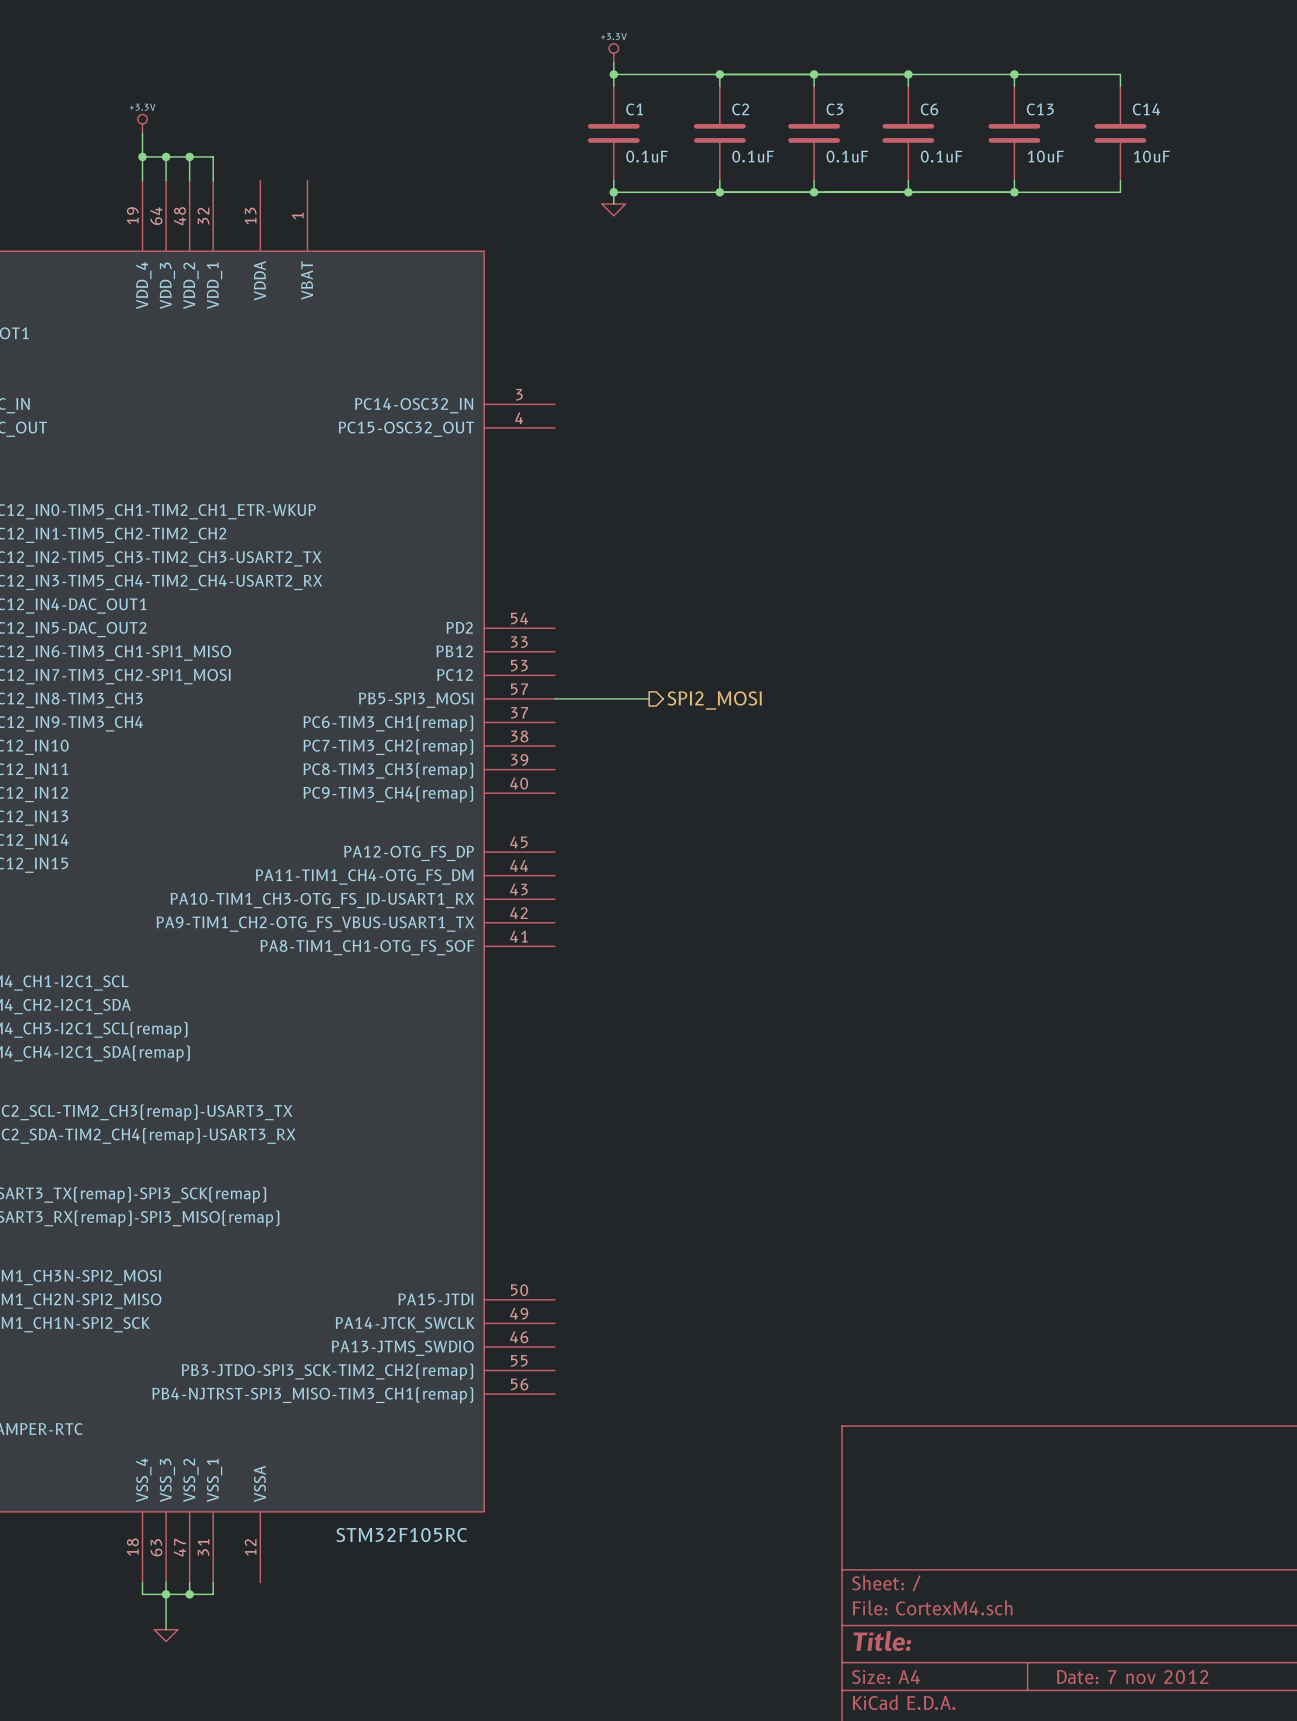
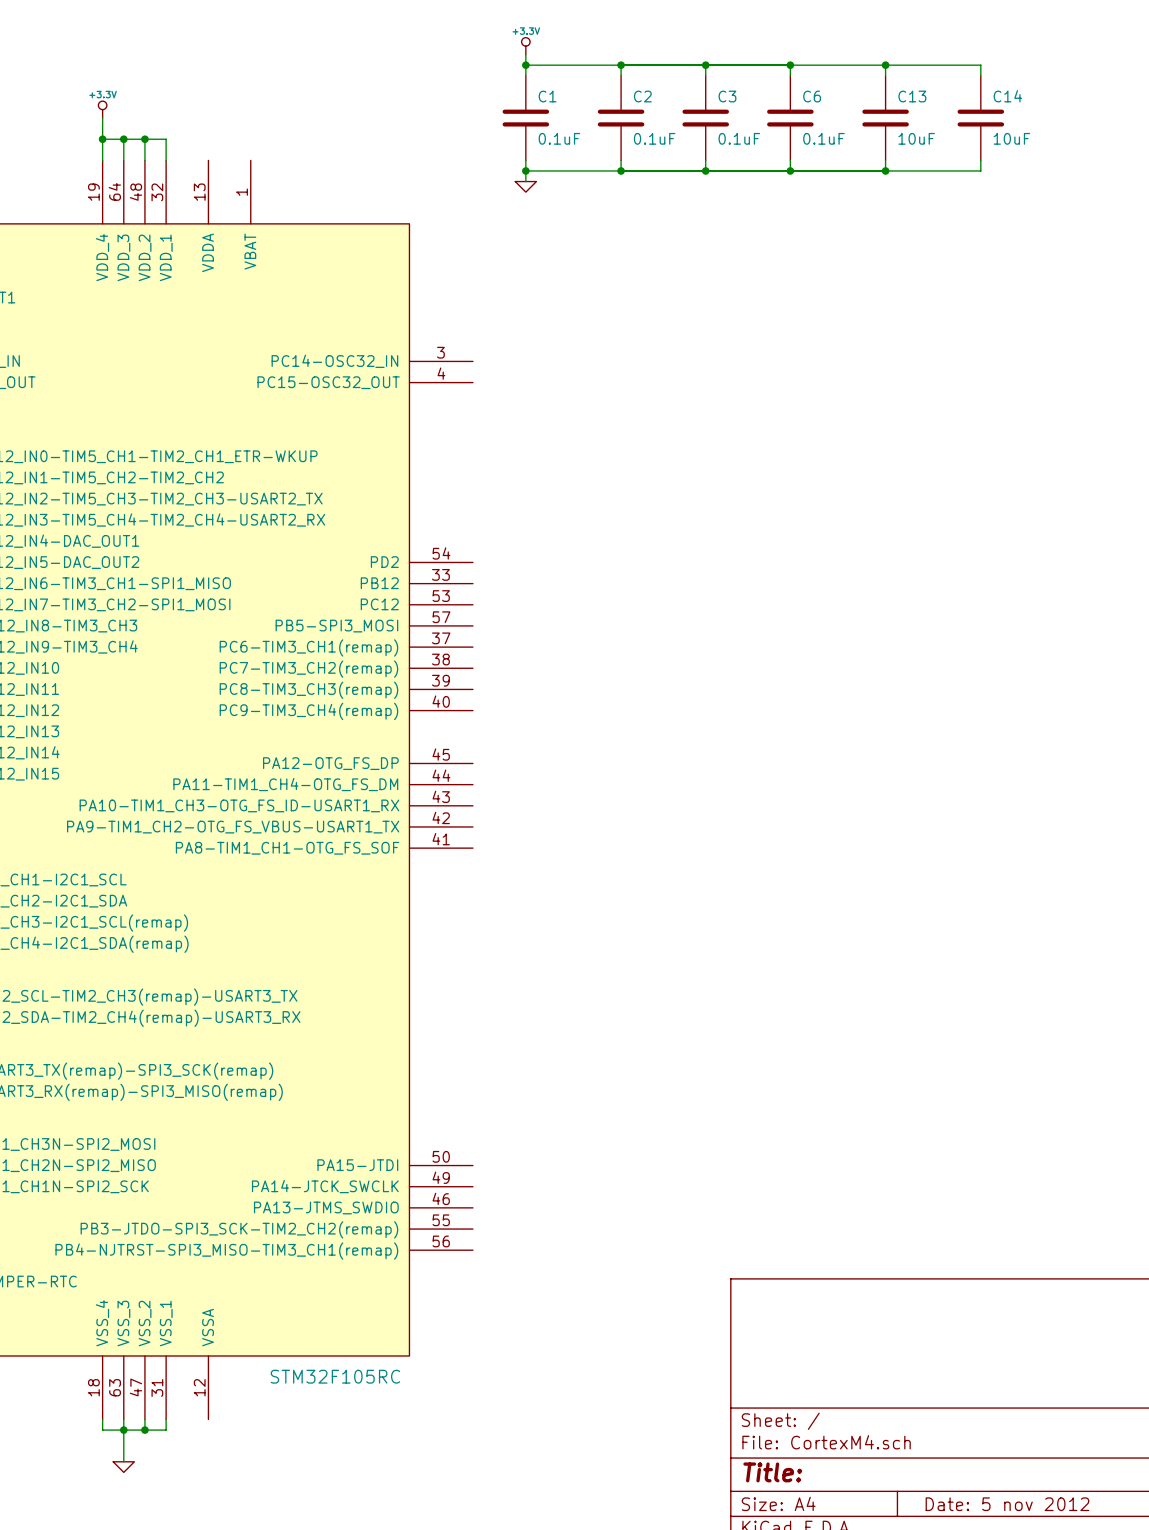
wire: (554, 698) (649, 698) -> none
hierarchical label: SPI2_MOSI (714, 700) -> none
title block: Date: 7 nov 2012 (1132, 1677) -> Date: 5 nov 2012 (1007, 1504)

